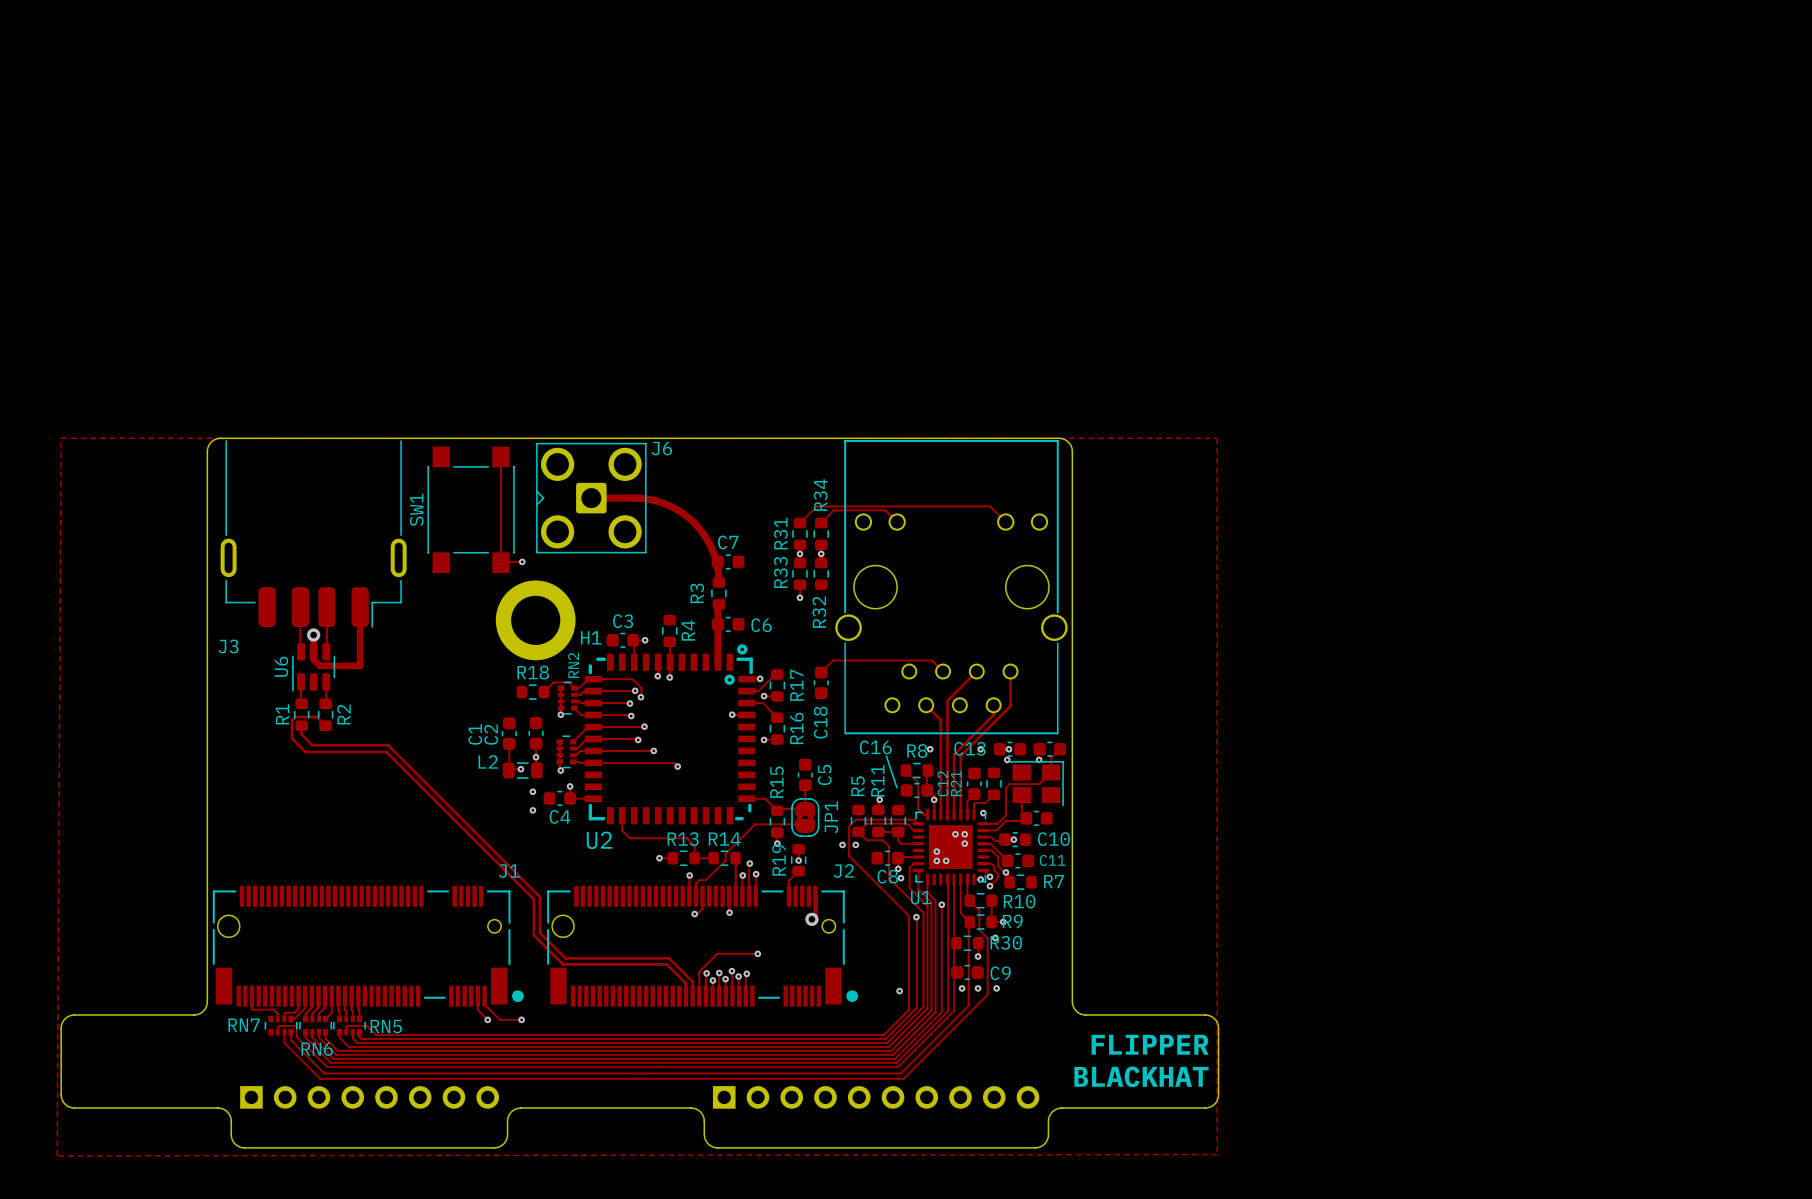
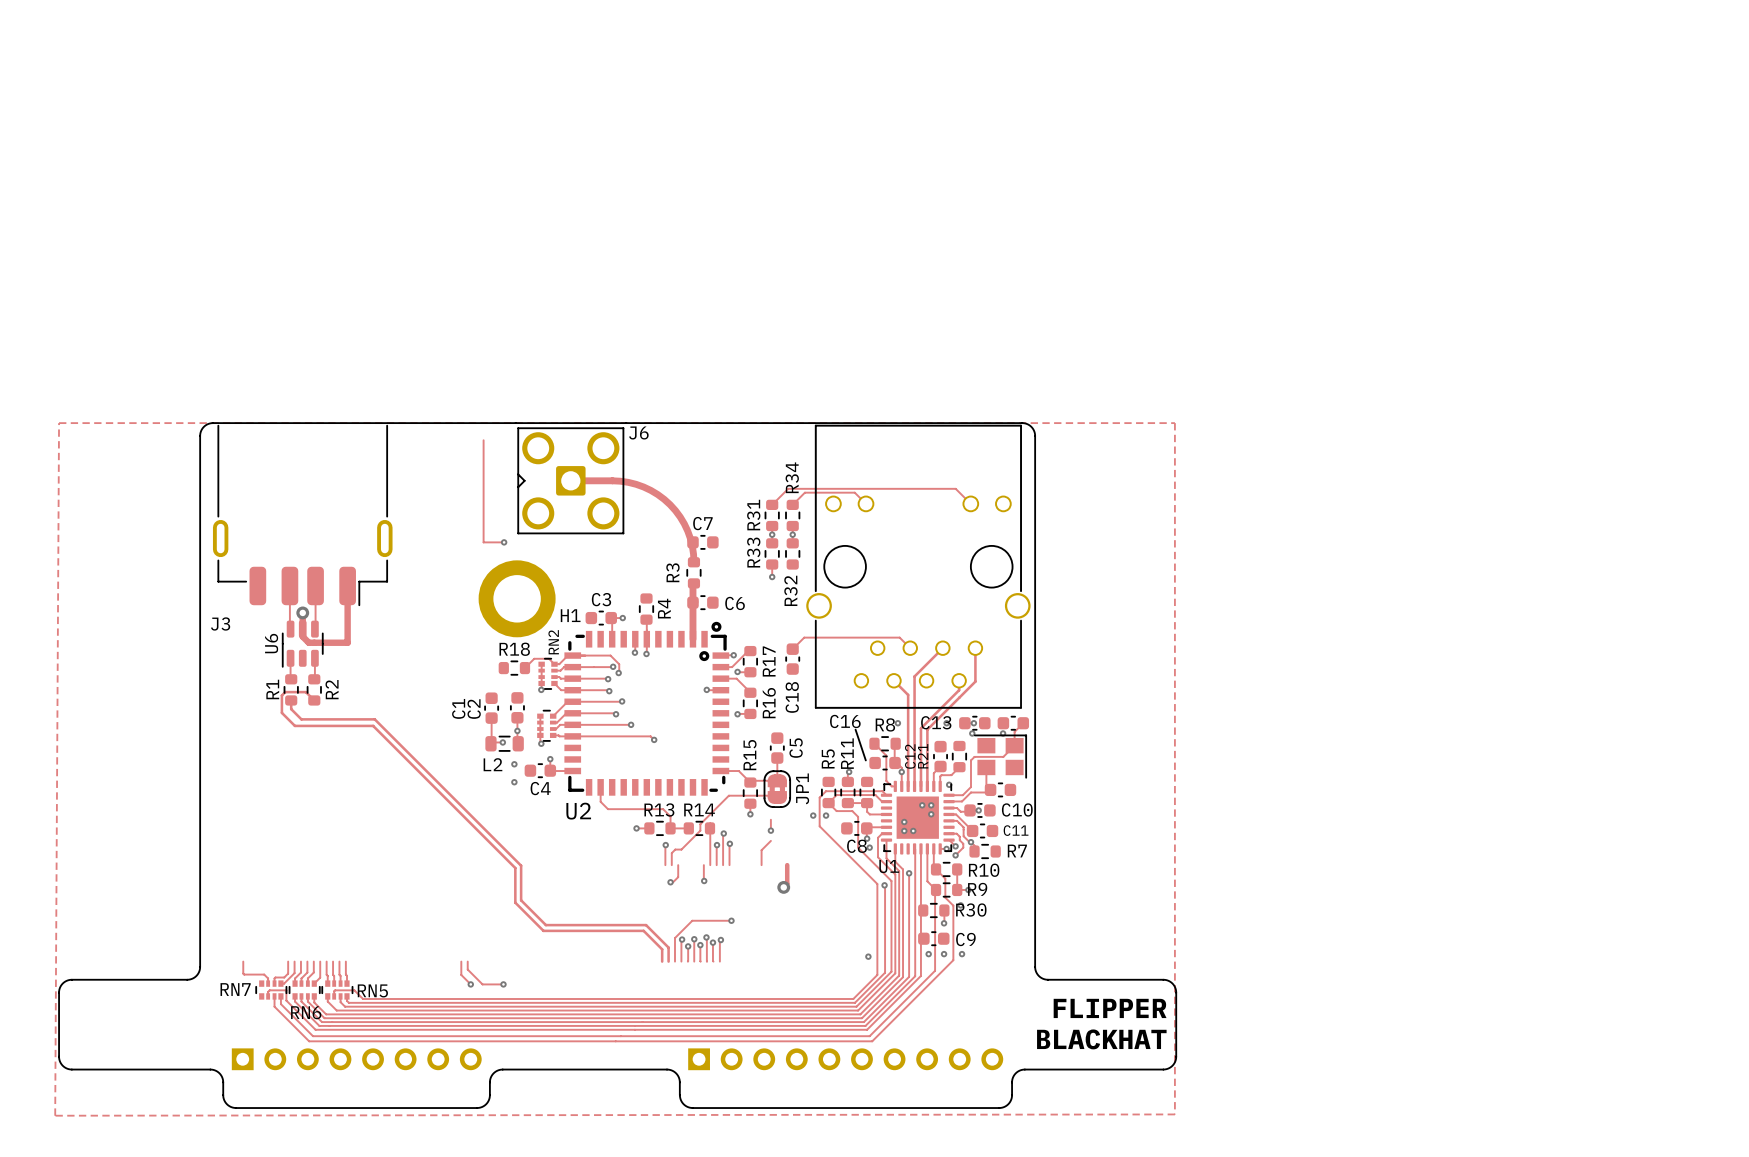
SW1: (471, 509) -> none
L2 name position: L2 (488, 761) -> L2 (492, 764)
R19: (798, 860) -> none
J1: (368, 946) -> none
J2: (702, 946) -> none

